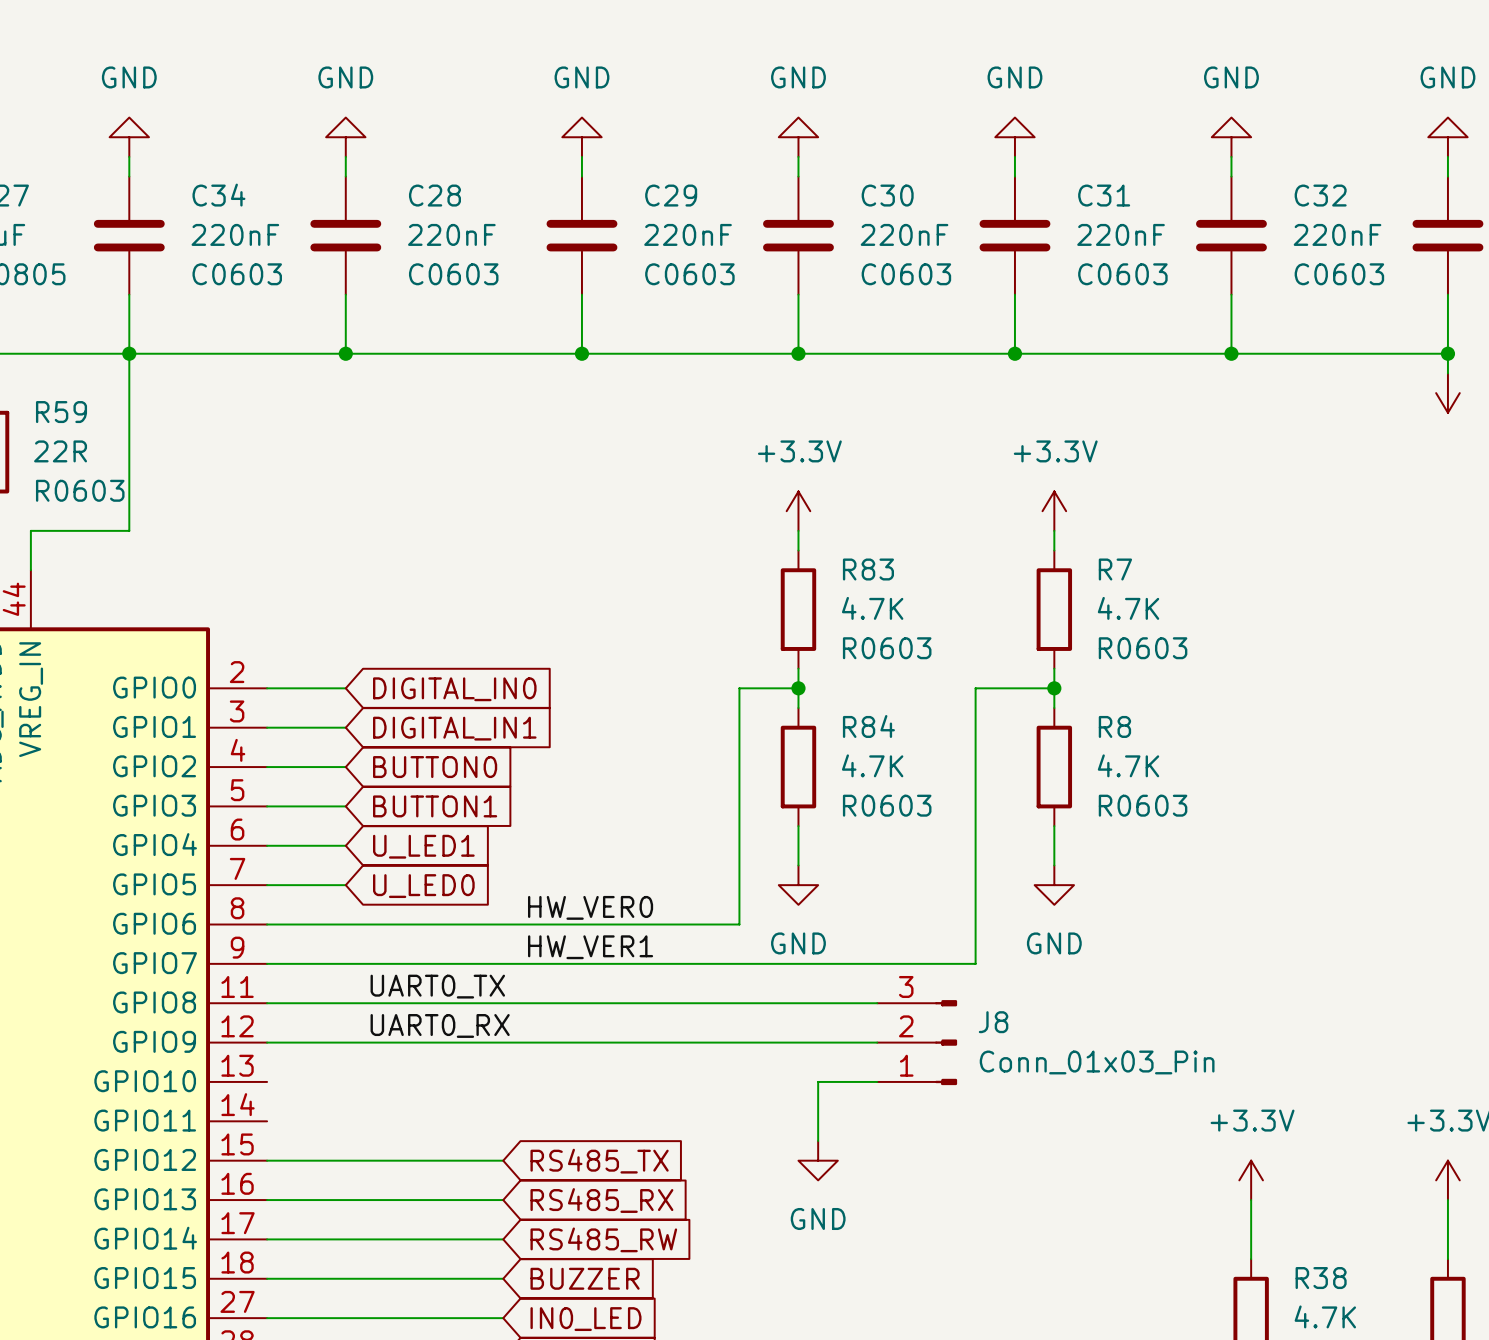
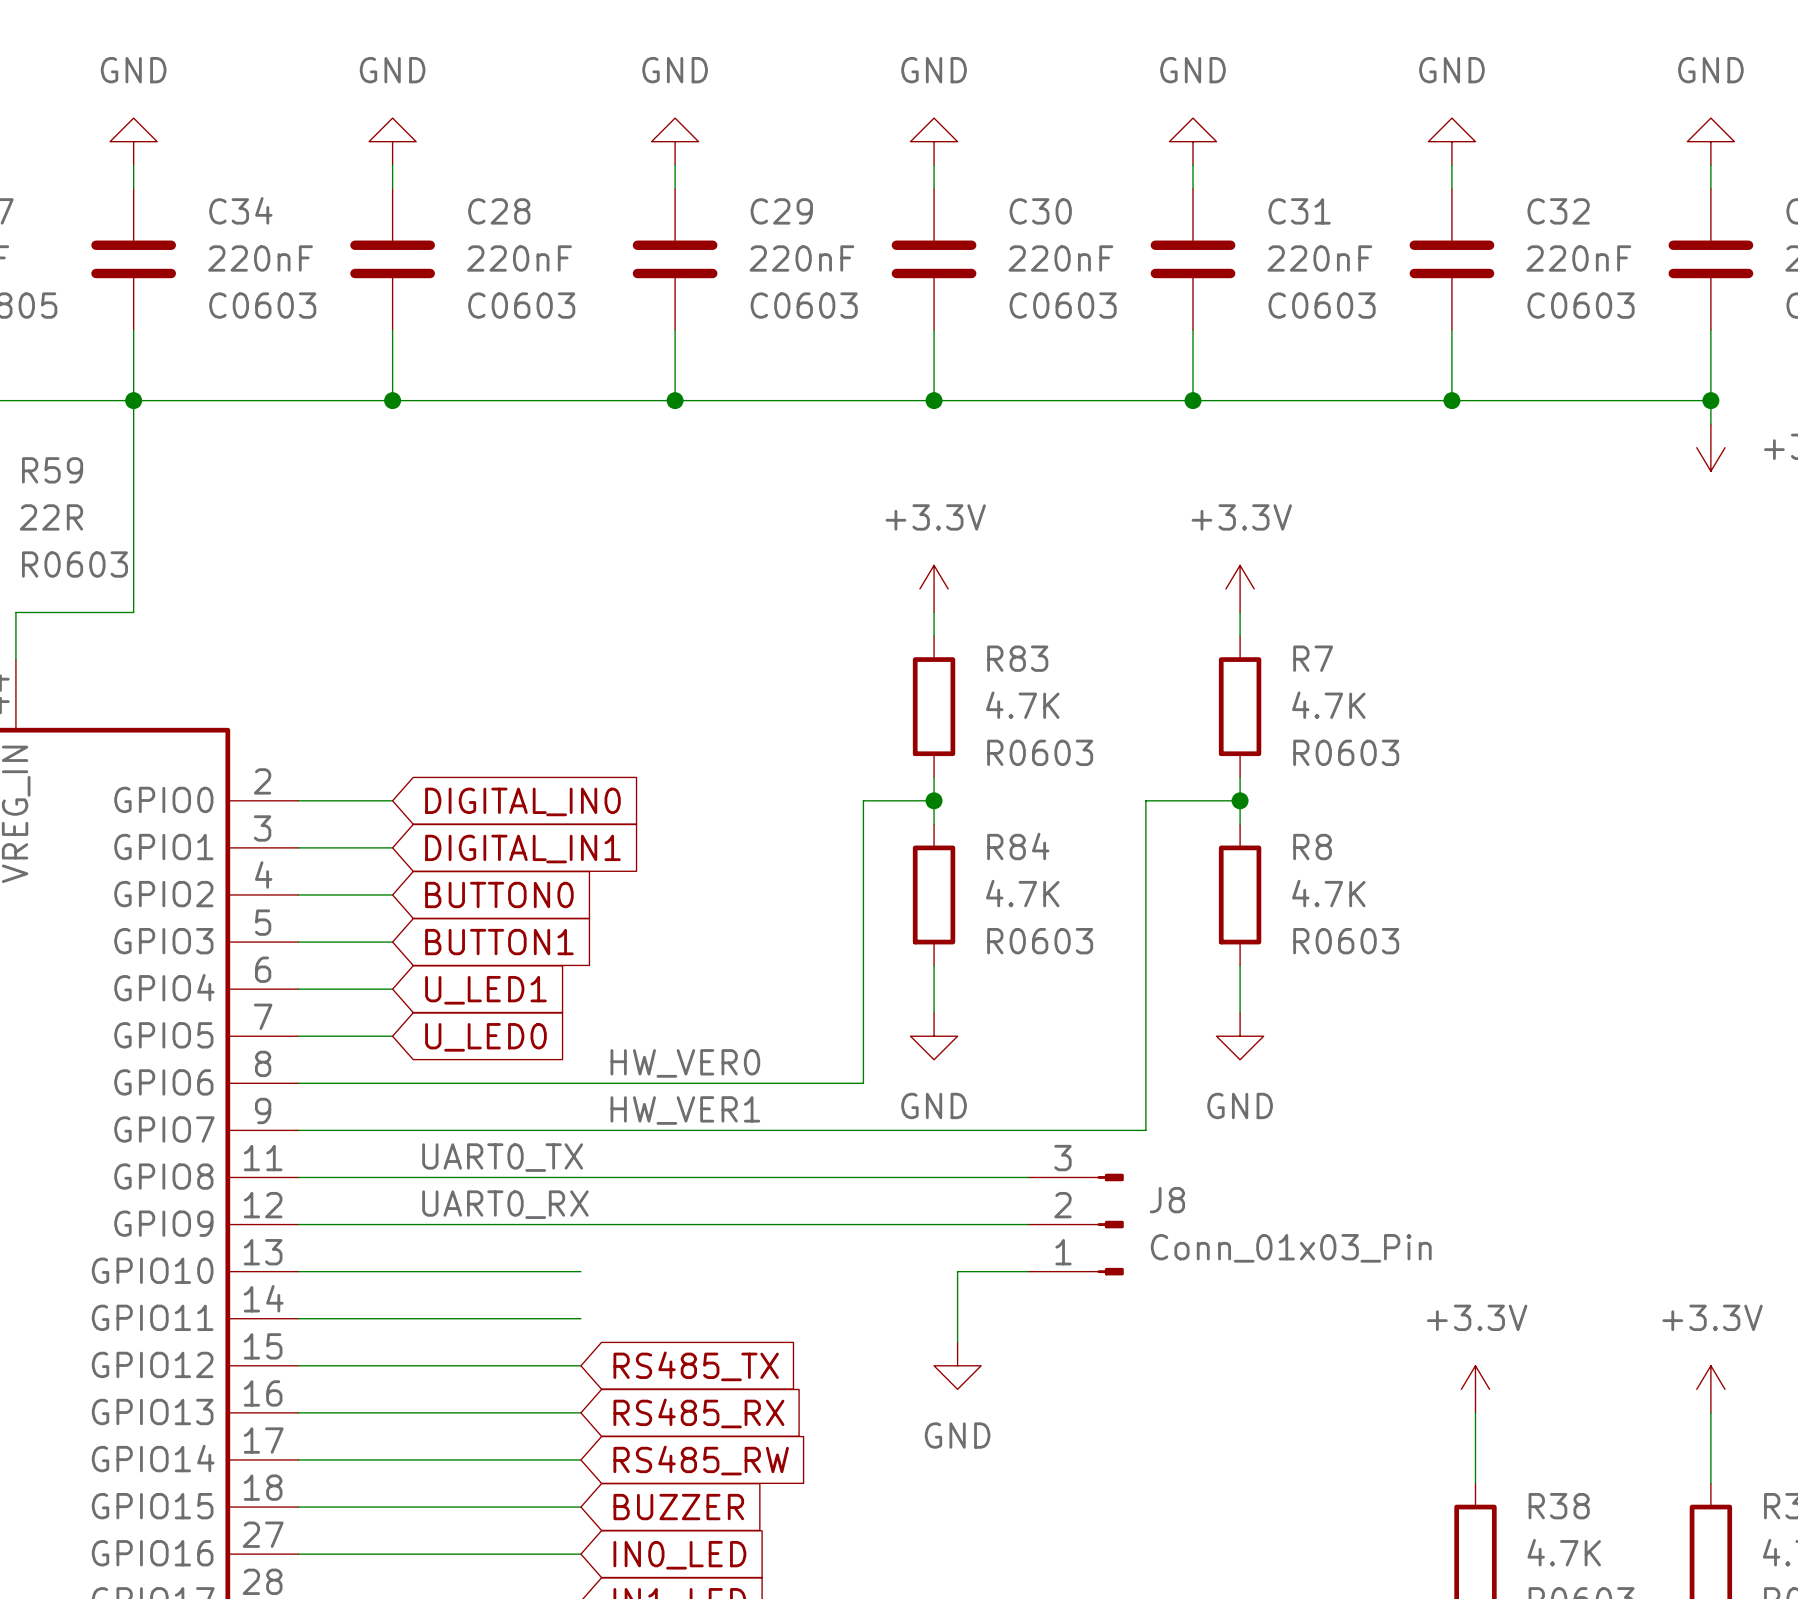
wire: none -> (298, 1271) (580, 1271)
wire: none -> (298, 1318) (580, 1318)

